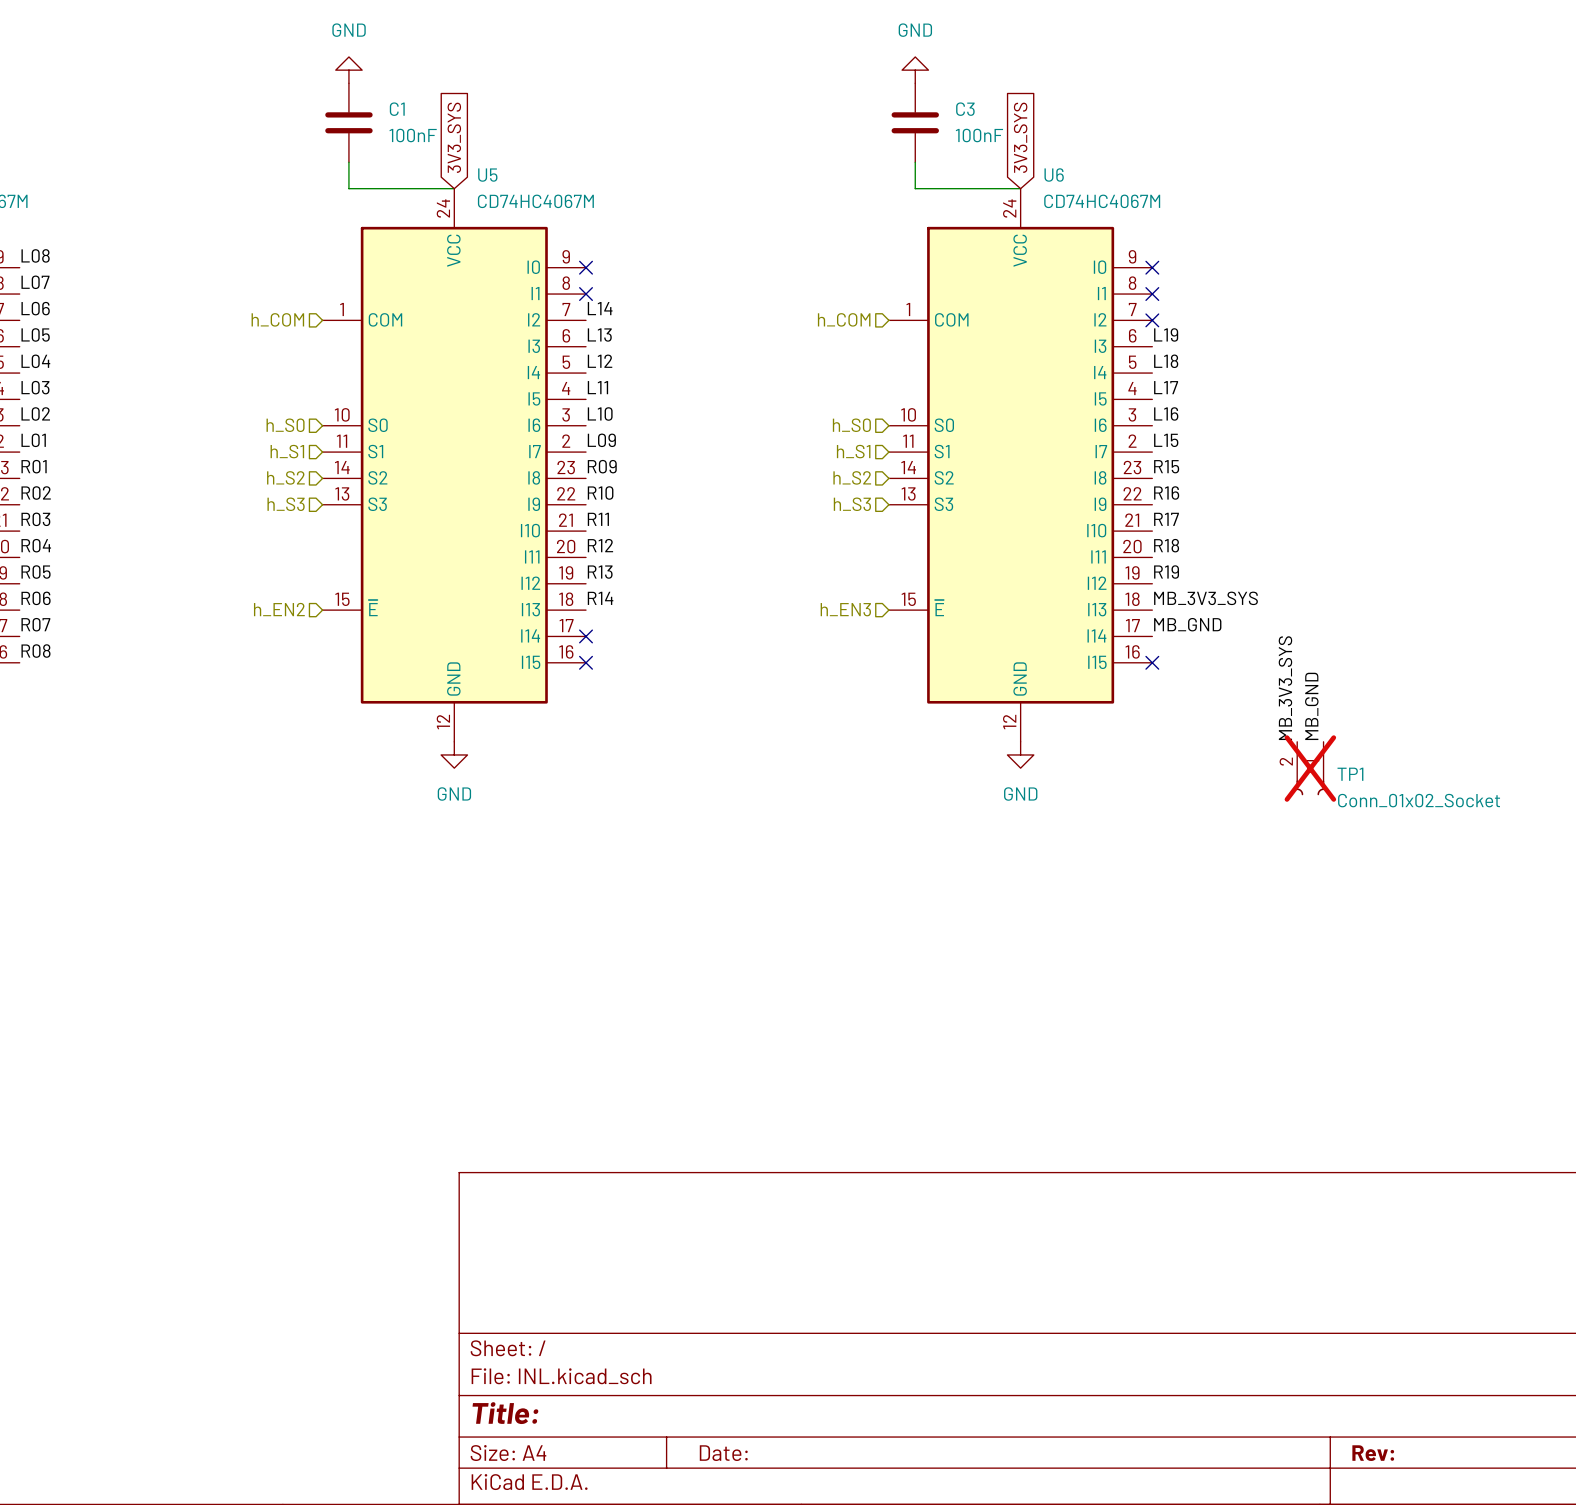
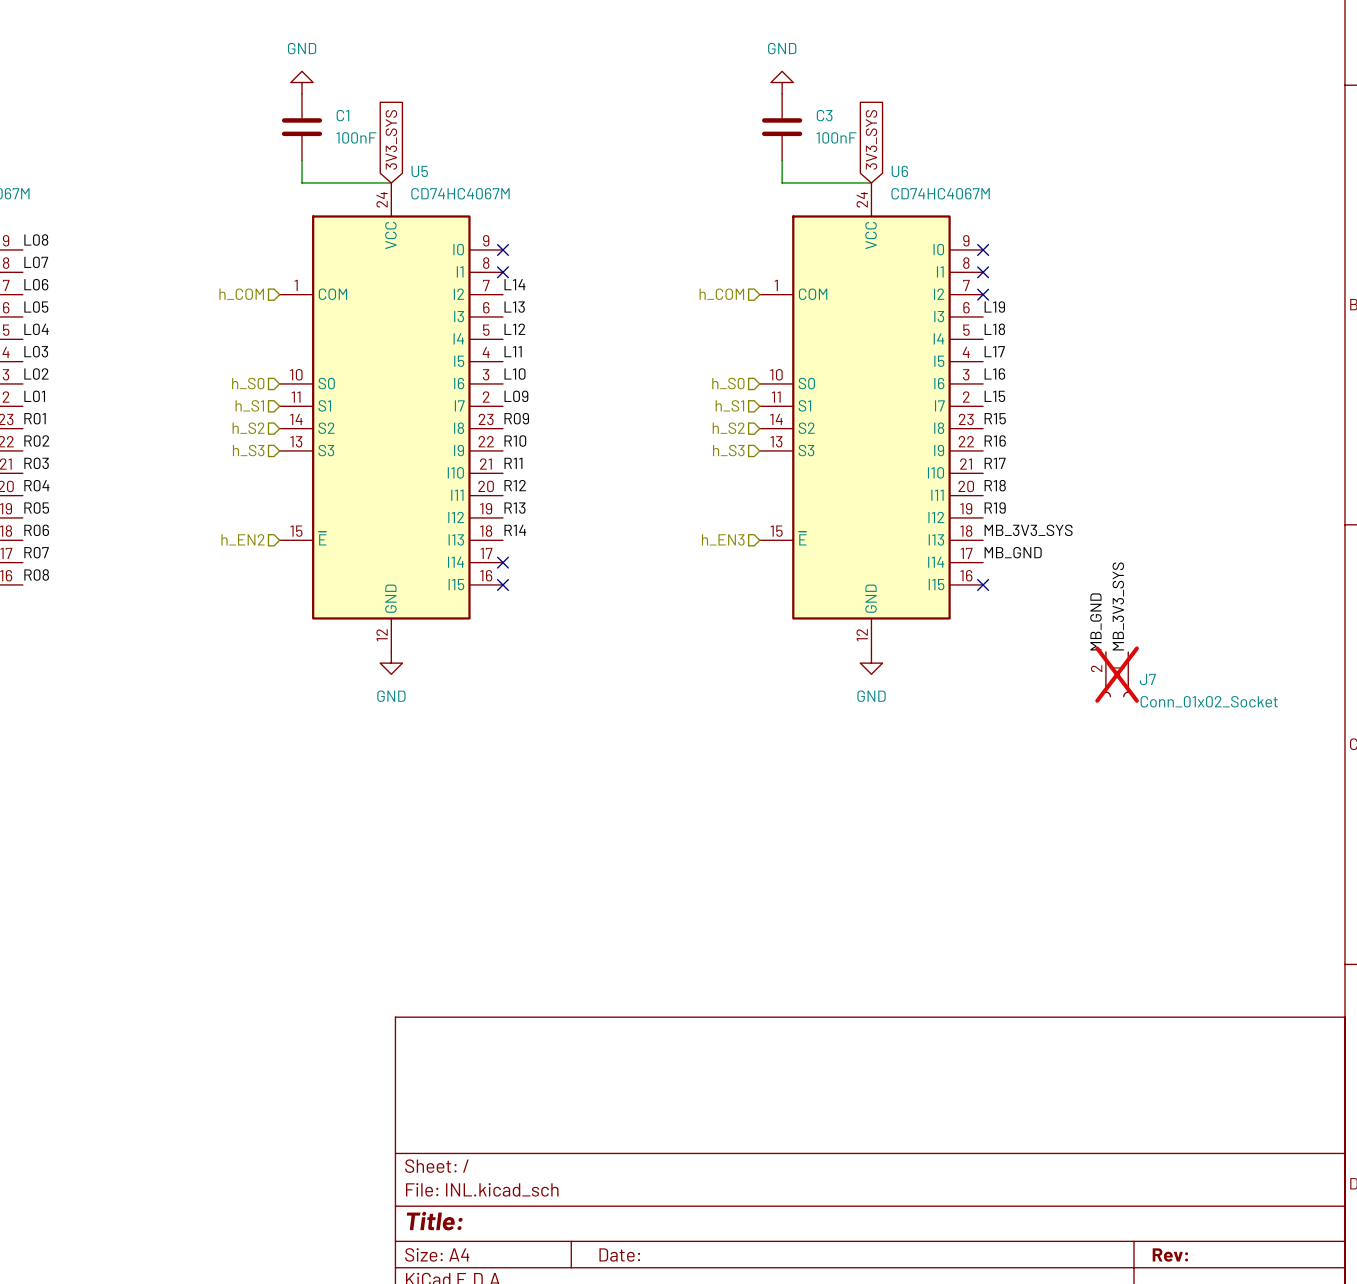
label: MB_3V3_SYS (1285, 688) -> MB_GND (1095, 621)
label: MB_GND (1311, 706) -> MB_3V3_SYS (1118, 606)
TP1 name: TP1 (1350, 774) -> J7 (1147, 679)

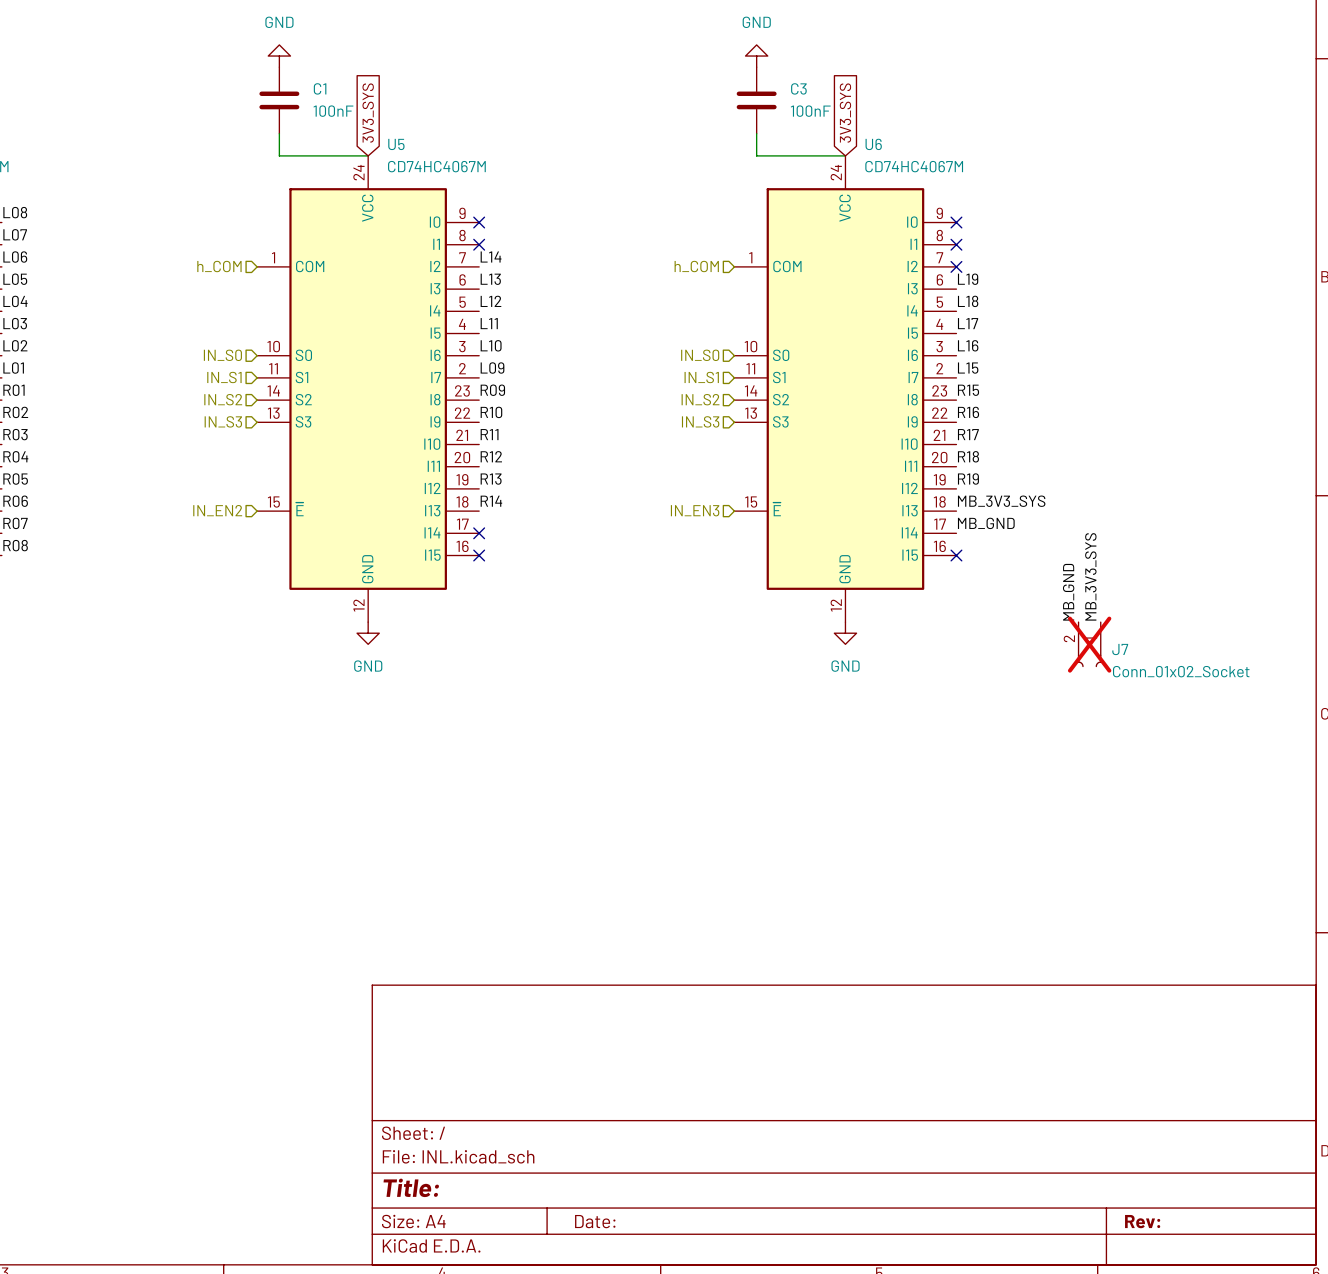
hierarchical label: h_S0 (248, 383) -> IN_S0 (222, 355)
hierarchical label: h_S0 (728, 383) -> IN_S0 (700, 355)
hierarchical label: h_S1 (249, 405) -> IN_S1 (224, 377)
hierarchical label: h_S1 (729, 405) -> IN_S1 (701, 377)
hierarchical label: h_S2 (248, 428) -> IN_S2 (223, 399)
hierarchical label: h_S2 (728, 428) -> IN_S2 (700, 399)
hierarchical label: h_S3 (248, 450) -> IN_S3 (223, 421)
hierarchical label: h_S3 (728, 450) -> IN_S3 (700, 421)
hierarchical label: h_EN2 (243, 539) -> IN_EN2 (217, 510)
hierarchical label: h_EN3 (723, 539) -> IN_EN3 (695, 510)

